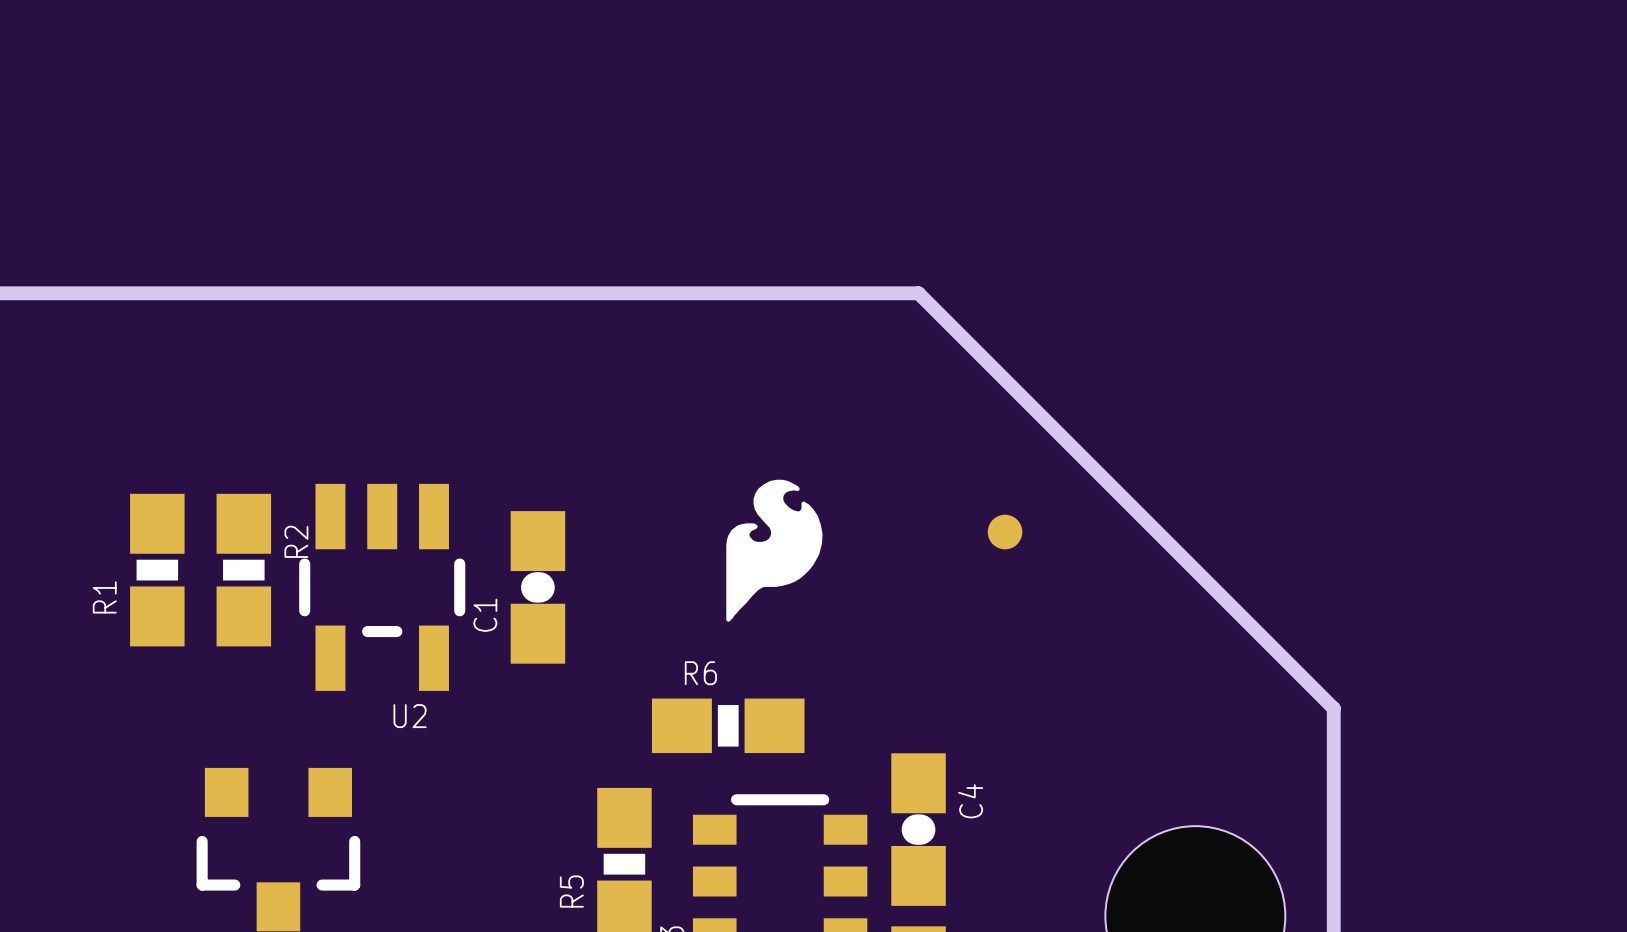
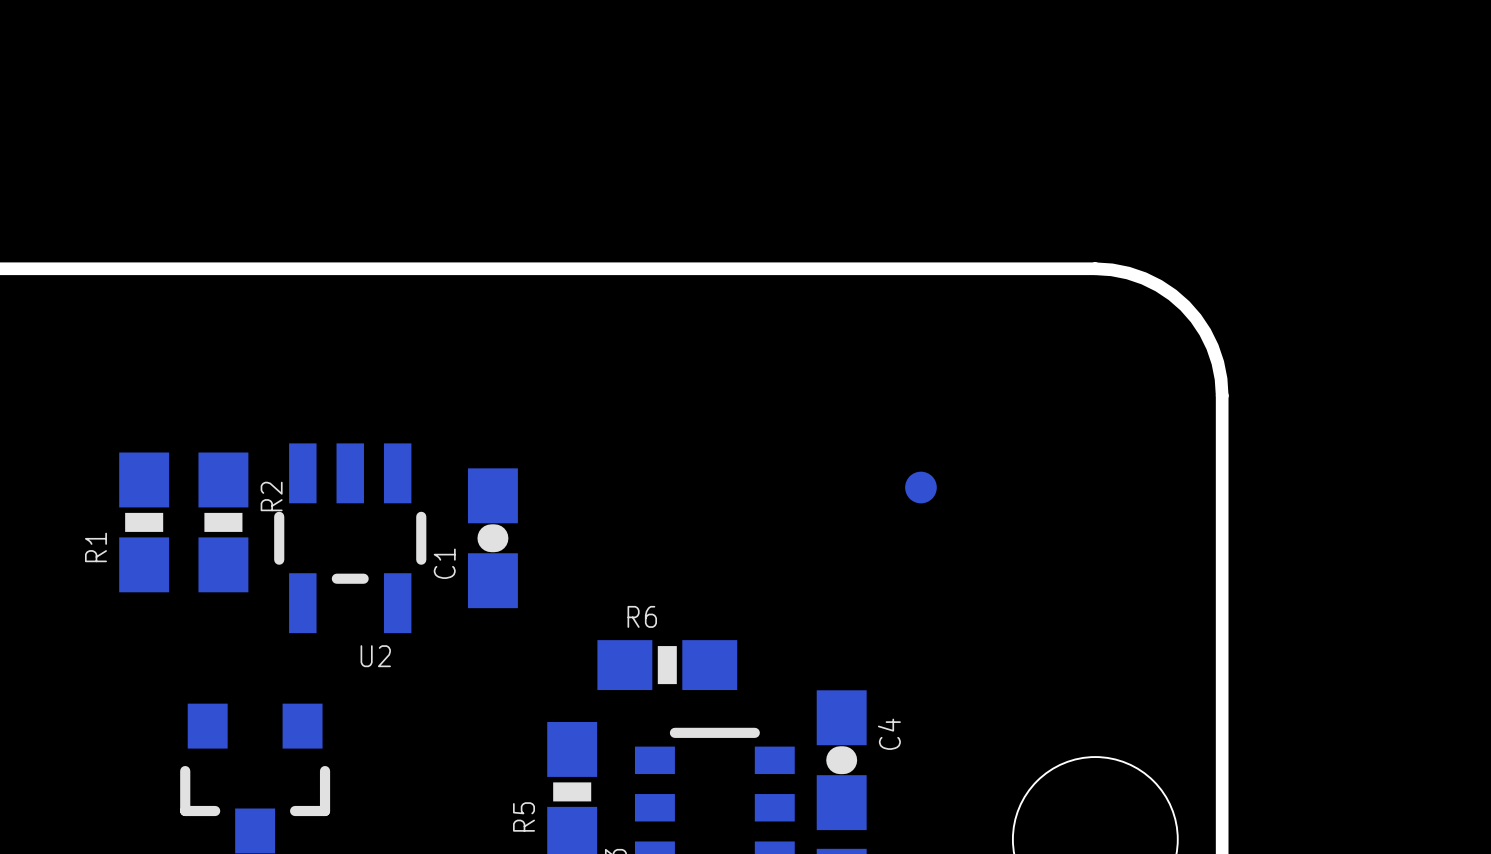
board edge: (918, 293) (1333, 708) -> (841, 268) (1111, 269) (1143, 278) (1172, 294) (1185, 305) (1195, 318) (1212, 347) (1221, 379) (1222, 649)
drawing: [726, 479, 823, 622] -> none

